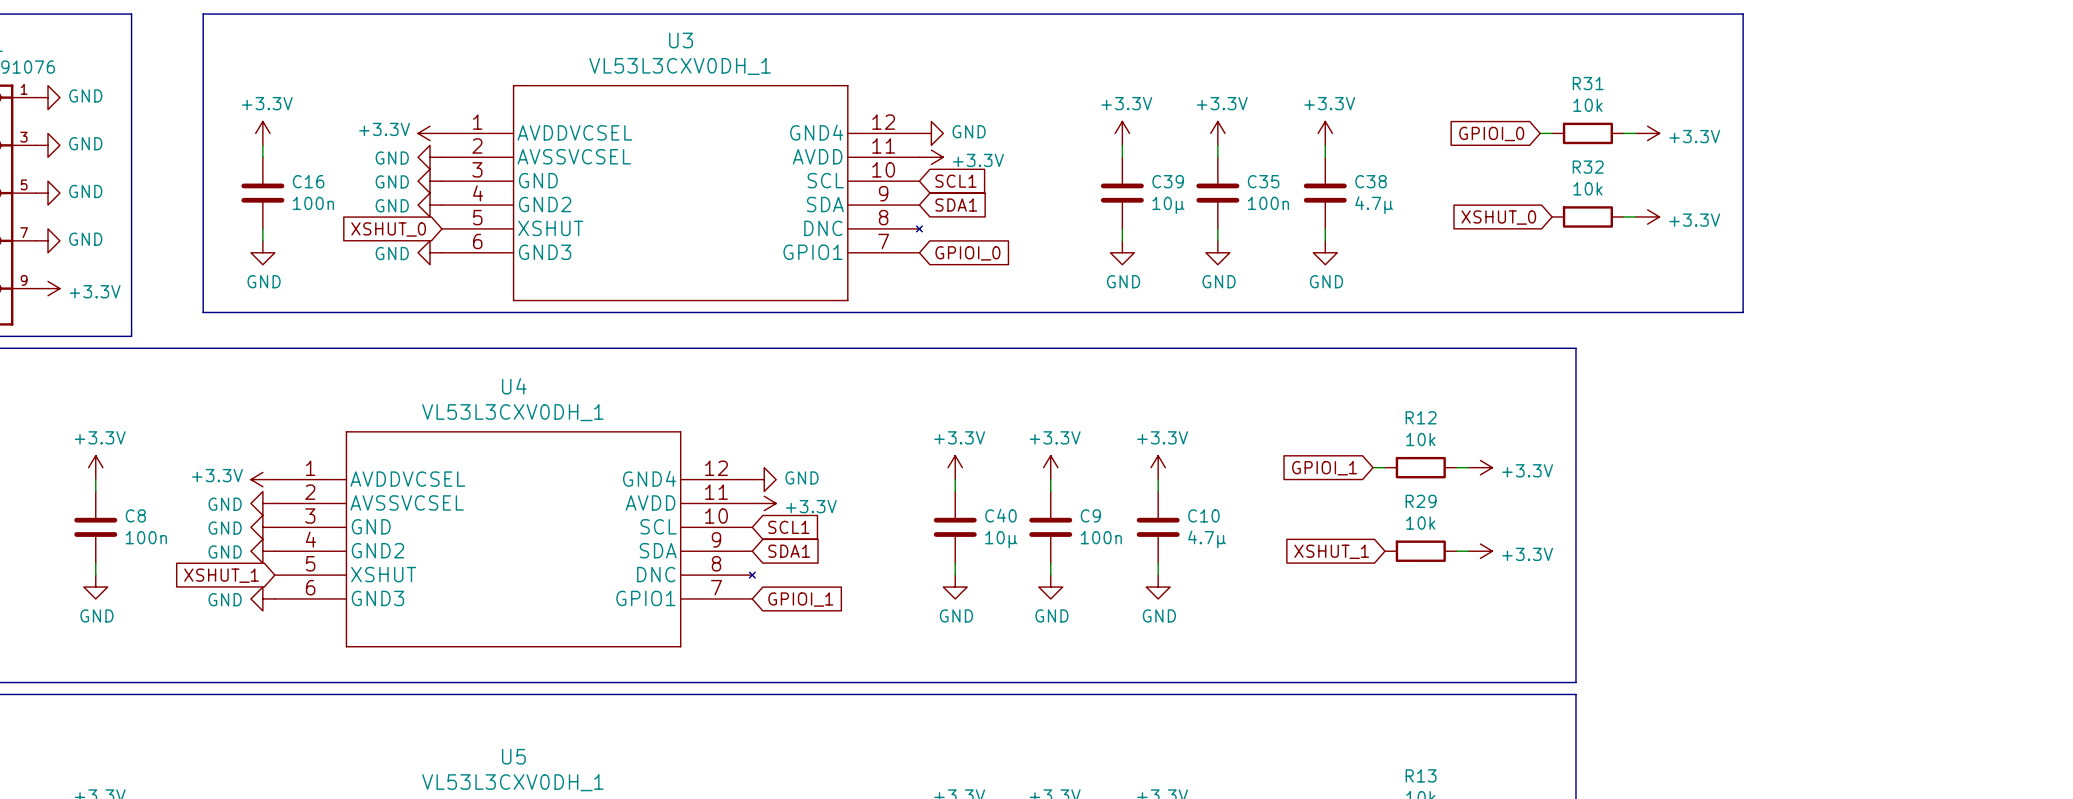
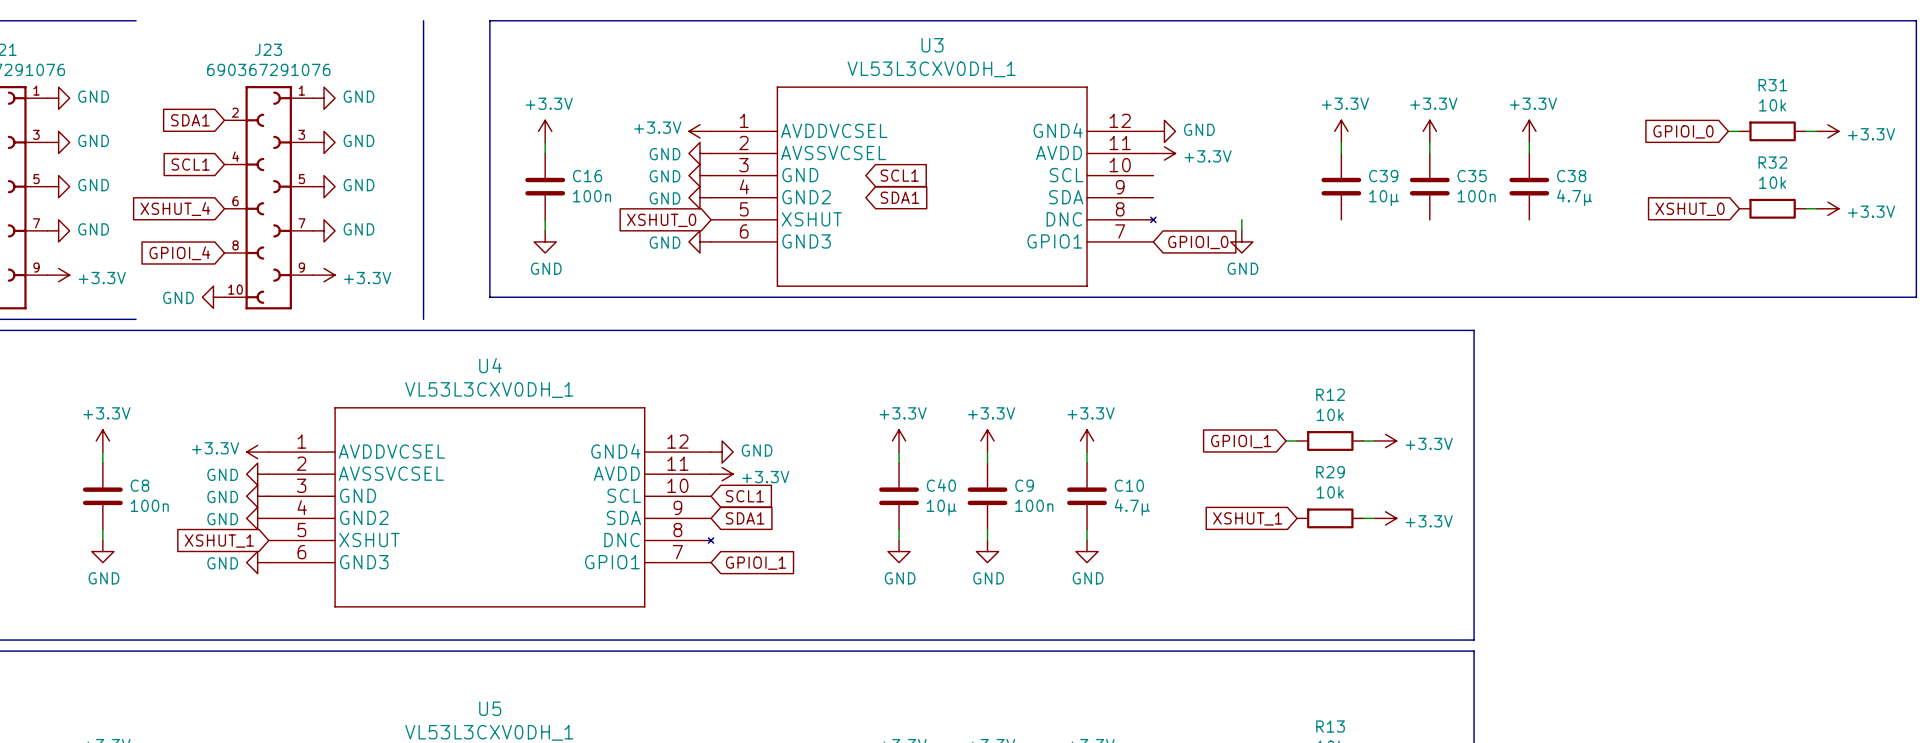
line: (131, 14) (131, 336) -> none
line: none -> (423, 20) (423, 319)
line: (513, 14) (203, 14) (203, 312) (513, 312) -> (489, 20) (489, 297)
line: (1743, 14) (1743, 312) -> (1628, 20) (1916, 20) (1916, 297) (1628, 297)
power symbol: none -> GND (324, 98)
power symbol text position: +3.3V (1222, 103) -> +3.3V (1208, 156)
global label: none -> SDA1 (190, 120)
power symbol: +3.3V (262, 133) -> none
power symbol: +3.3V (430, 133) -> none
power symbol: none -> +3.3V (545, 131)
power symbol: none -> +3.3V (699, 131)
power symbol: GND (931, 133) -> none
power symbol: +3.3V (1122, 133) -> none
power symbol rotation: 0° (1217, 133) -> 90° clockwise (1164, 153)
power symbol position: +3.3V (1217, 133) -> +3.3V (1164, 153)
power symbol: none -> GND (1164, 131)
power symbol: +3.3V (1325, 133) -> none
power symbol: none -> +3.3V (1341, 131)
global label: GPIOI_0 (1491, 133) -> none
power symbol: none -> +3.3V (1429, 131)
wire: (1540, 133) (1552, 133) -> none
R31 position: (1587, 133) -> (1772, 131)
wire: (1623, 133) (1635, 133) -> (1728, 131) (1739, 131)
power symbol rotation: 0° (1647, 133) -> 90° counterclockwise (1529, 131)
global label: none -> GPIOI_0 (1683, 131)
wire: none -> (1805, 131) (1816, 131)
power symbol: none -> +3.3V (1827, 131)
power symbol text position: +3.3V (1694, 136) -> +3.3V (1533, 103)
wire: (262, 145) (262, 157) -> none
power symbol: none -> GND (324, 142)
wire: none -> (545, 142) (545, 153)
wire: (1122, 145) (1122, 157) -> none
wire: (1217, 145) (1217, 157) -> none
wire: (1325, 145) (1325, 157) -> (1341, 142) (1341, 153)
wire: none -> (1429, 142) (1429, 153)
wire: none -> (1529, 142) (1529, 153)
power symbol: GND (430, 157) -> none
power symbol: none -> GND (699, 153)
power symbol: +3.3V (931, 157) -> none
global label: none -> SCL1 (190, 164)
power symbol: GND (430, 181) -> none
power symbol: none -> GND (699, 175)
C16 position: (262, 193) -> (545, 186)
power symbol: none -> GND (324, 186)
U3 position: (682, 193) -> (933, 186)
C39 position: (1122, 193) -> (1341, 186)
C35 position: (1217, 193) -> (1429, 186)
C38 position: (1325, 193) -> (1529, 186)
J23: none -> 690367291076 (268, 197)
power symbol: GND (430, 205) -> none
power symbol: none -> GND (699, 197)
R32 position: (1587, 216) -> (1772, 208)
wire: (1623, 216) (1635, 216) -> none
power symbol: +3.3V (1647, 216) -> none
wire: none -> (1805, 208) (1816, 208)
power symbol: none -> +3.3V (1827, 208)
global label: none -> XSHUT_4 (175, 209)
global label: XSHUT_0 (1498, 217) -> none
global label: none -> XSHUT_0 (1690, 209)
wire: (262, 228) (262, 240) -> none
wire: none -> (545, 219) (545, 230)
wire: (1122, 228) (1122, 240) -> none
wire: (1217, 228) (1217, 240) -> none
global label: XSHUT_0 (388, 229) -> none
global label: none -> XSHUT_0 (661, 220)
power symbol: none -> GND (324, 230)
power symbol: GND (262, 252) -> none
power symbol: GND (430, 252) -> none
power symbol: none -> GND (545, 241)
power symbol: none -> GND (699, 241)
power symbol: GND (1122, 252) -> none
power symbol: GND (1217, 252) -> none
global label: GPIOI_0 (967, 253) -> none
global label: none -> GPIOI_0 (1198, 242)
global label: none -> GPIOI_4 (179, 253)
power symbol: none -> +3.3V (324, 275)
power symbol: none -> GND (213, 297)

